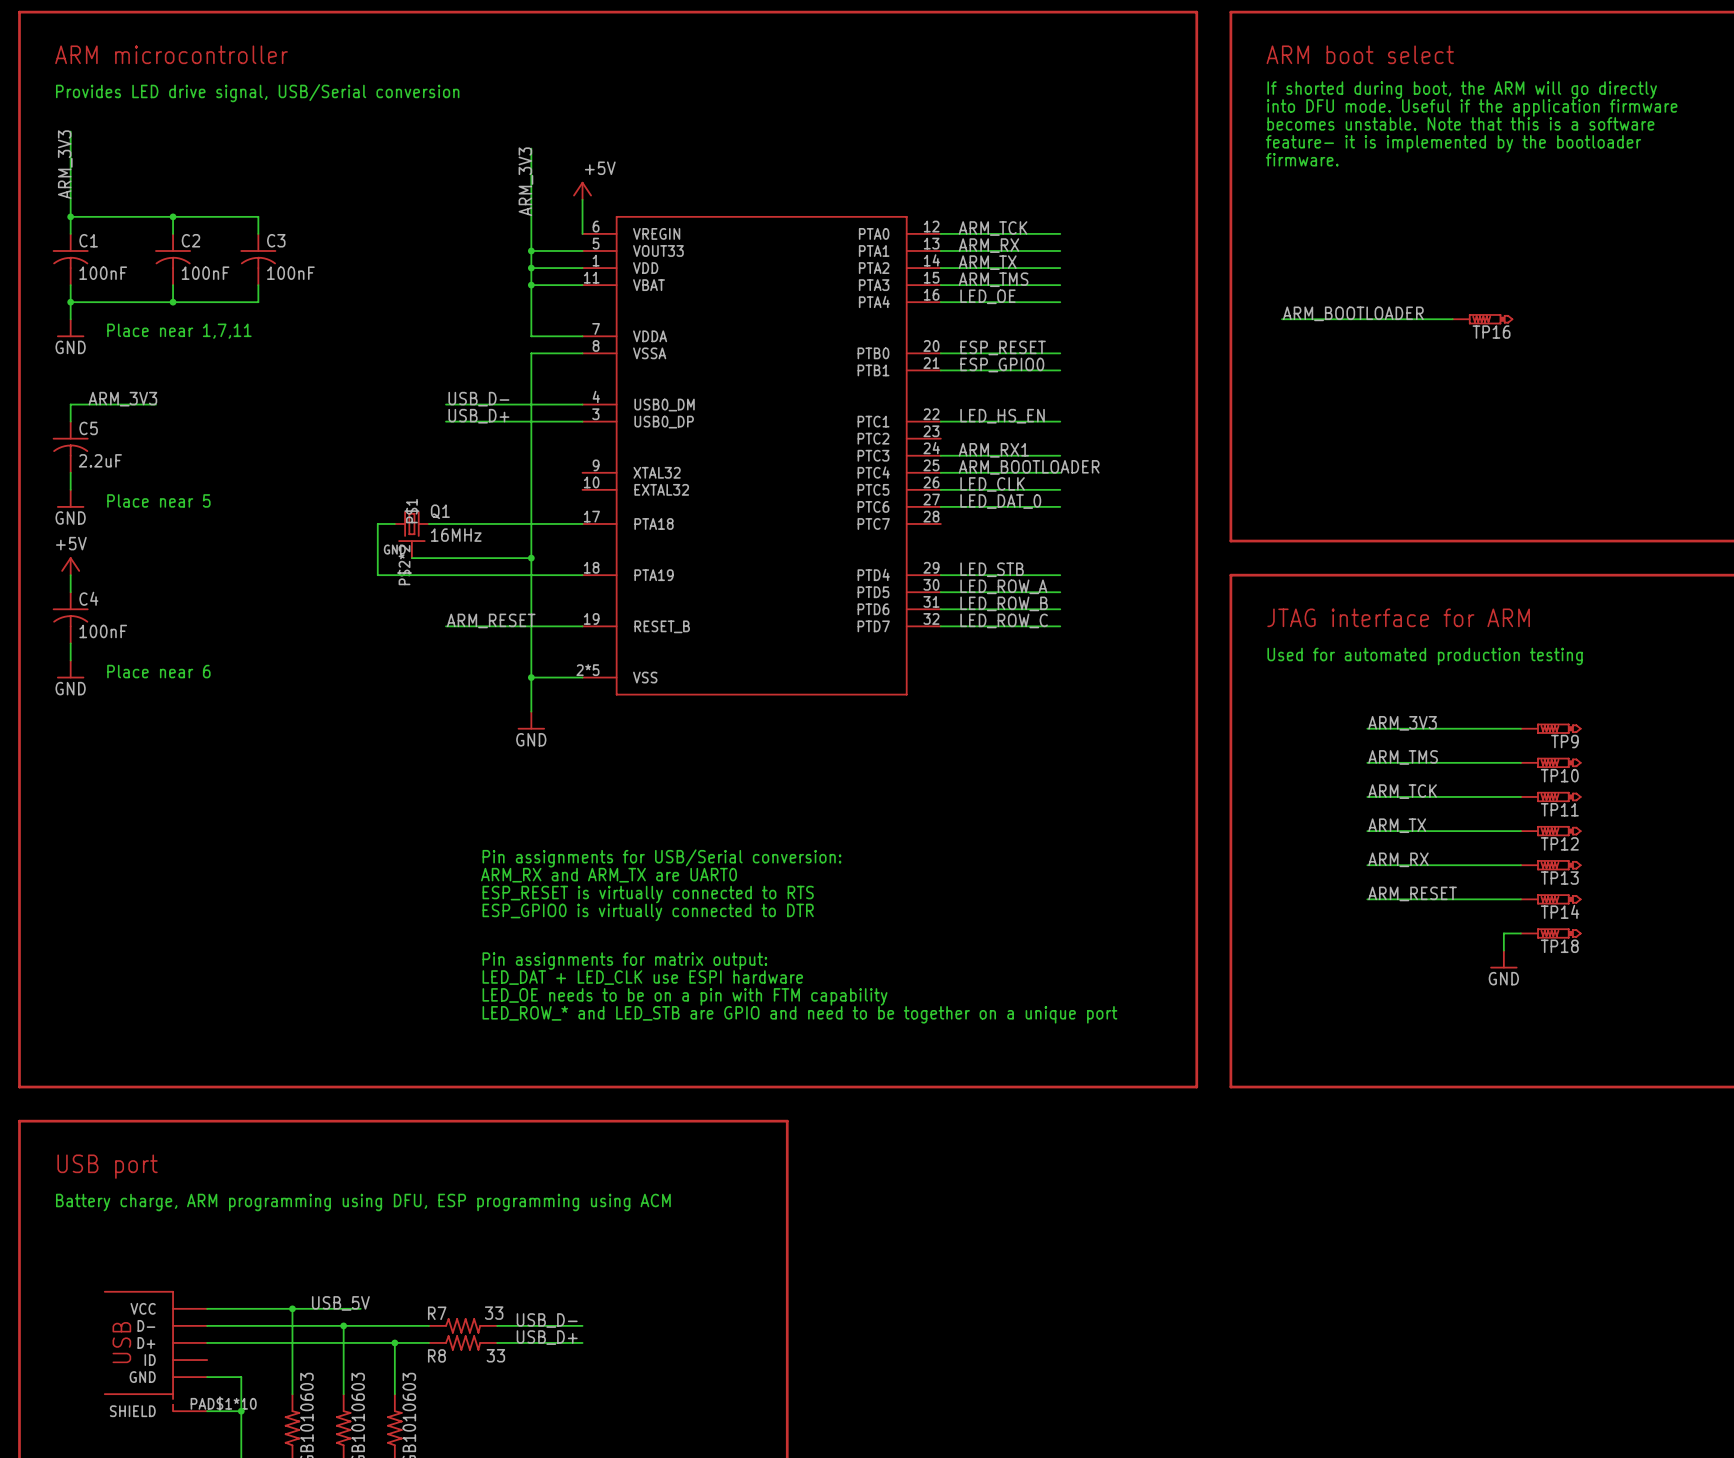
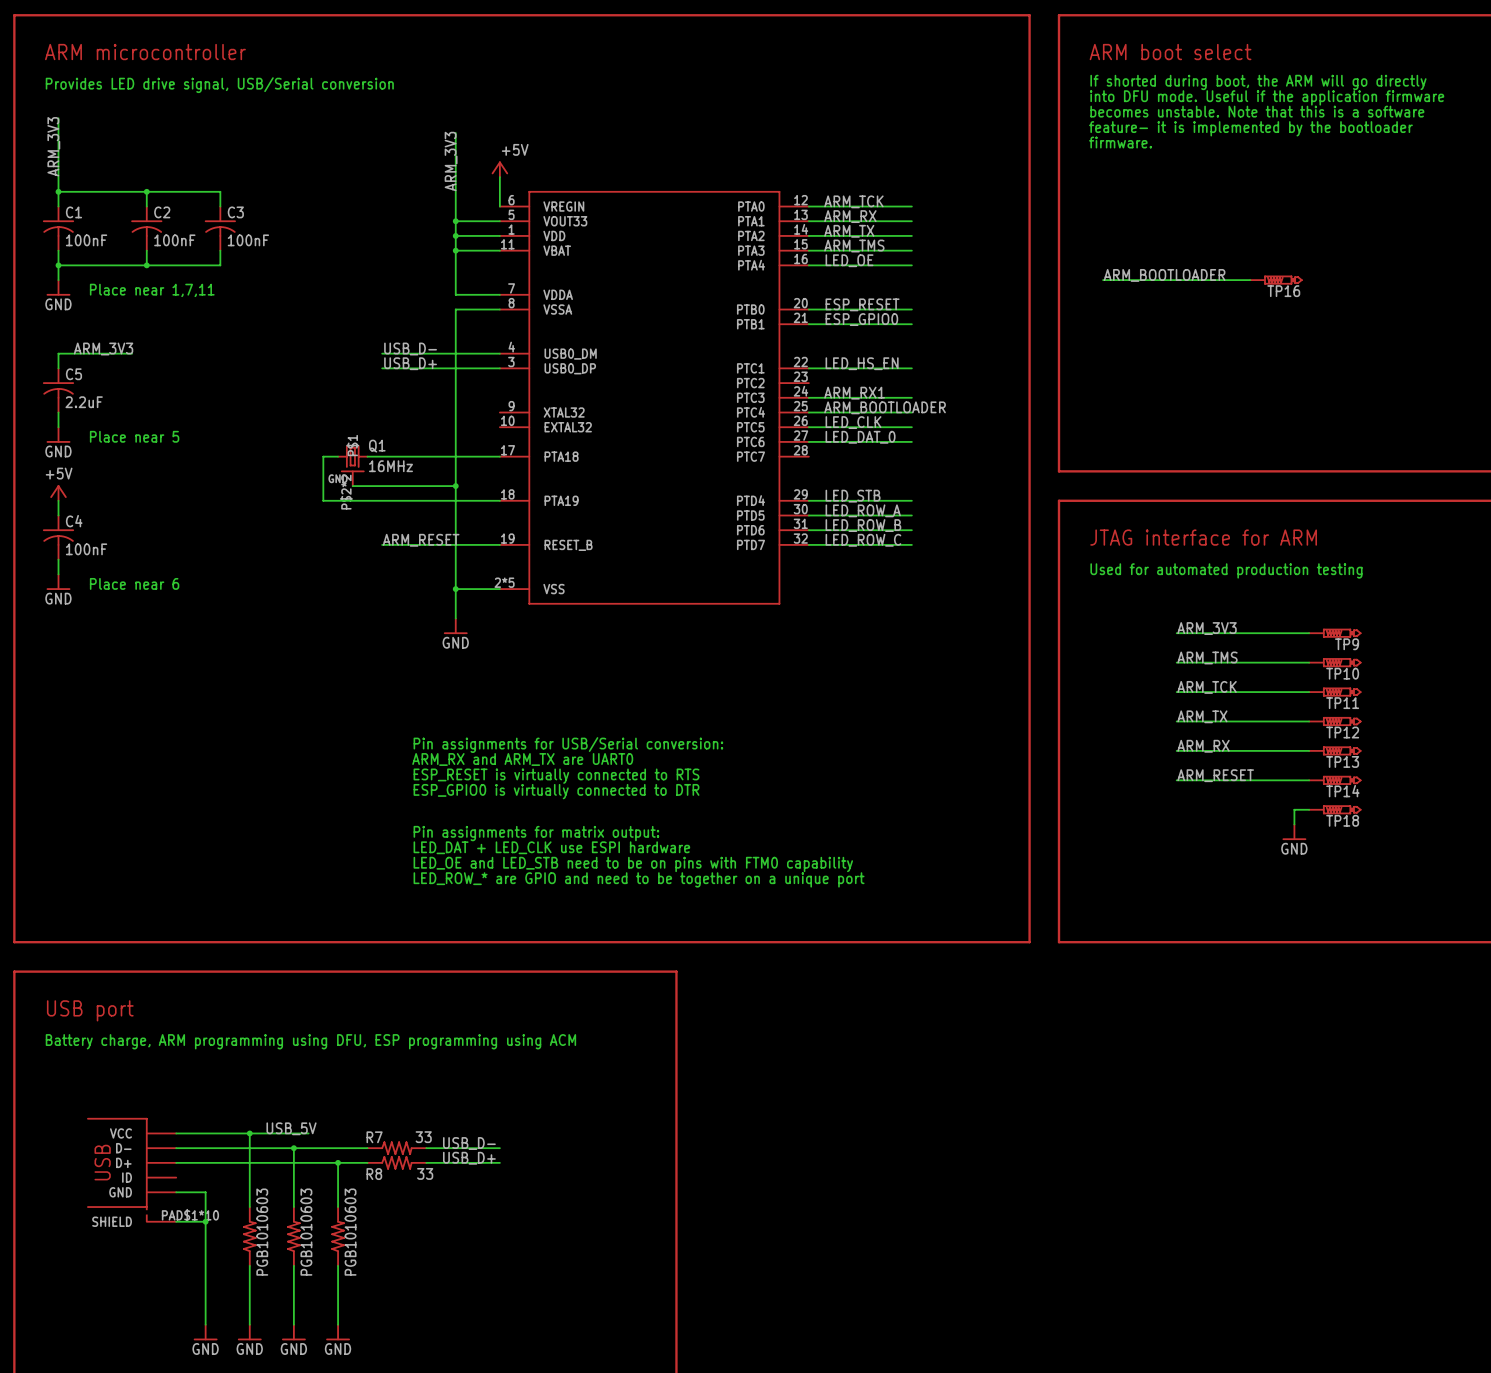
text: LED_OE needs to be on a pin with FTM capability (685, 996) -> LED_OE and LED_STB need to be on pins with FTM0 capability (633, 864)
text: LED_ROW_* and LED_STB are GPIO and need to be together on a unique port (799, 1014) -> LED_ROW_* are GPIO and need to be together on a unique port (639, 879)

